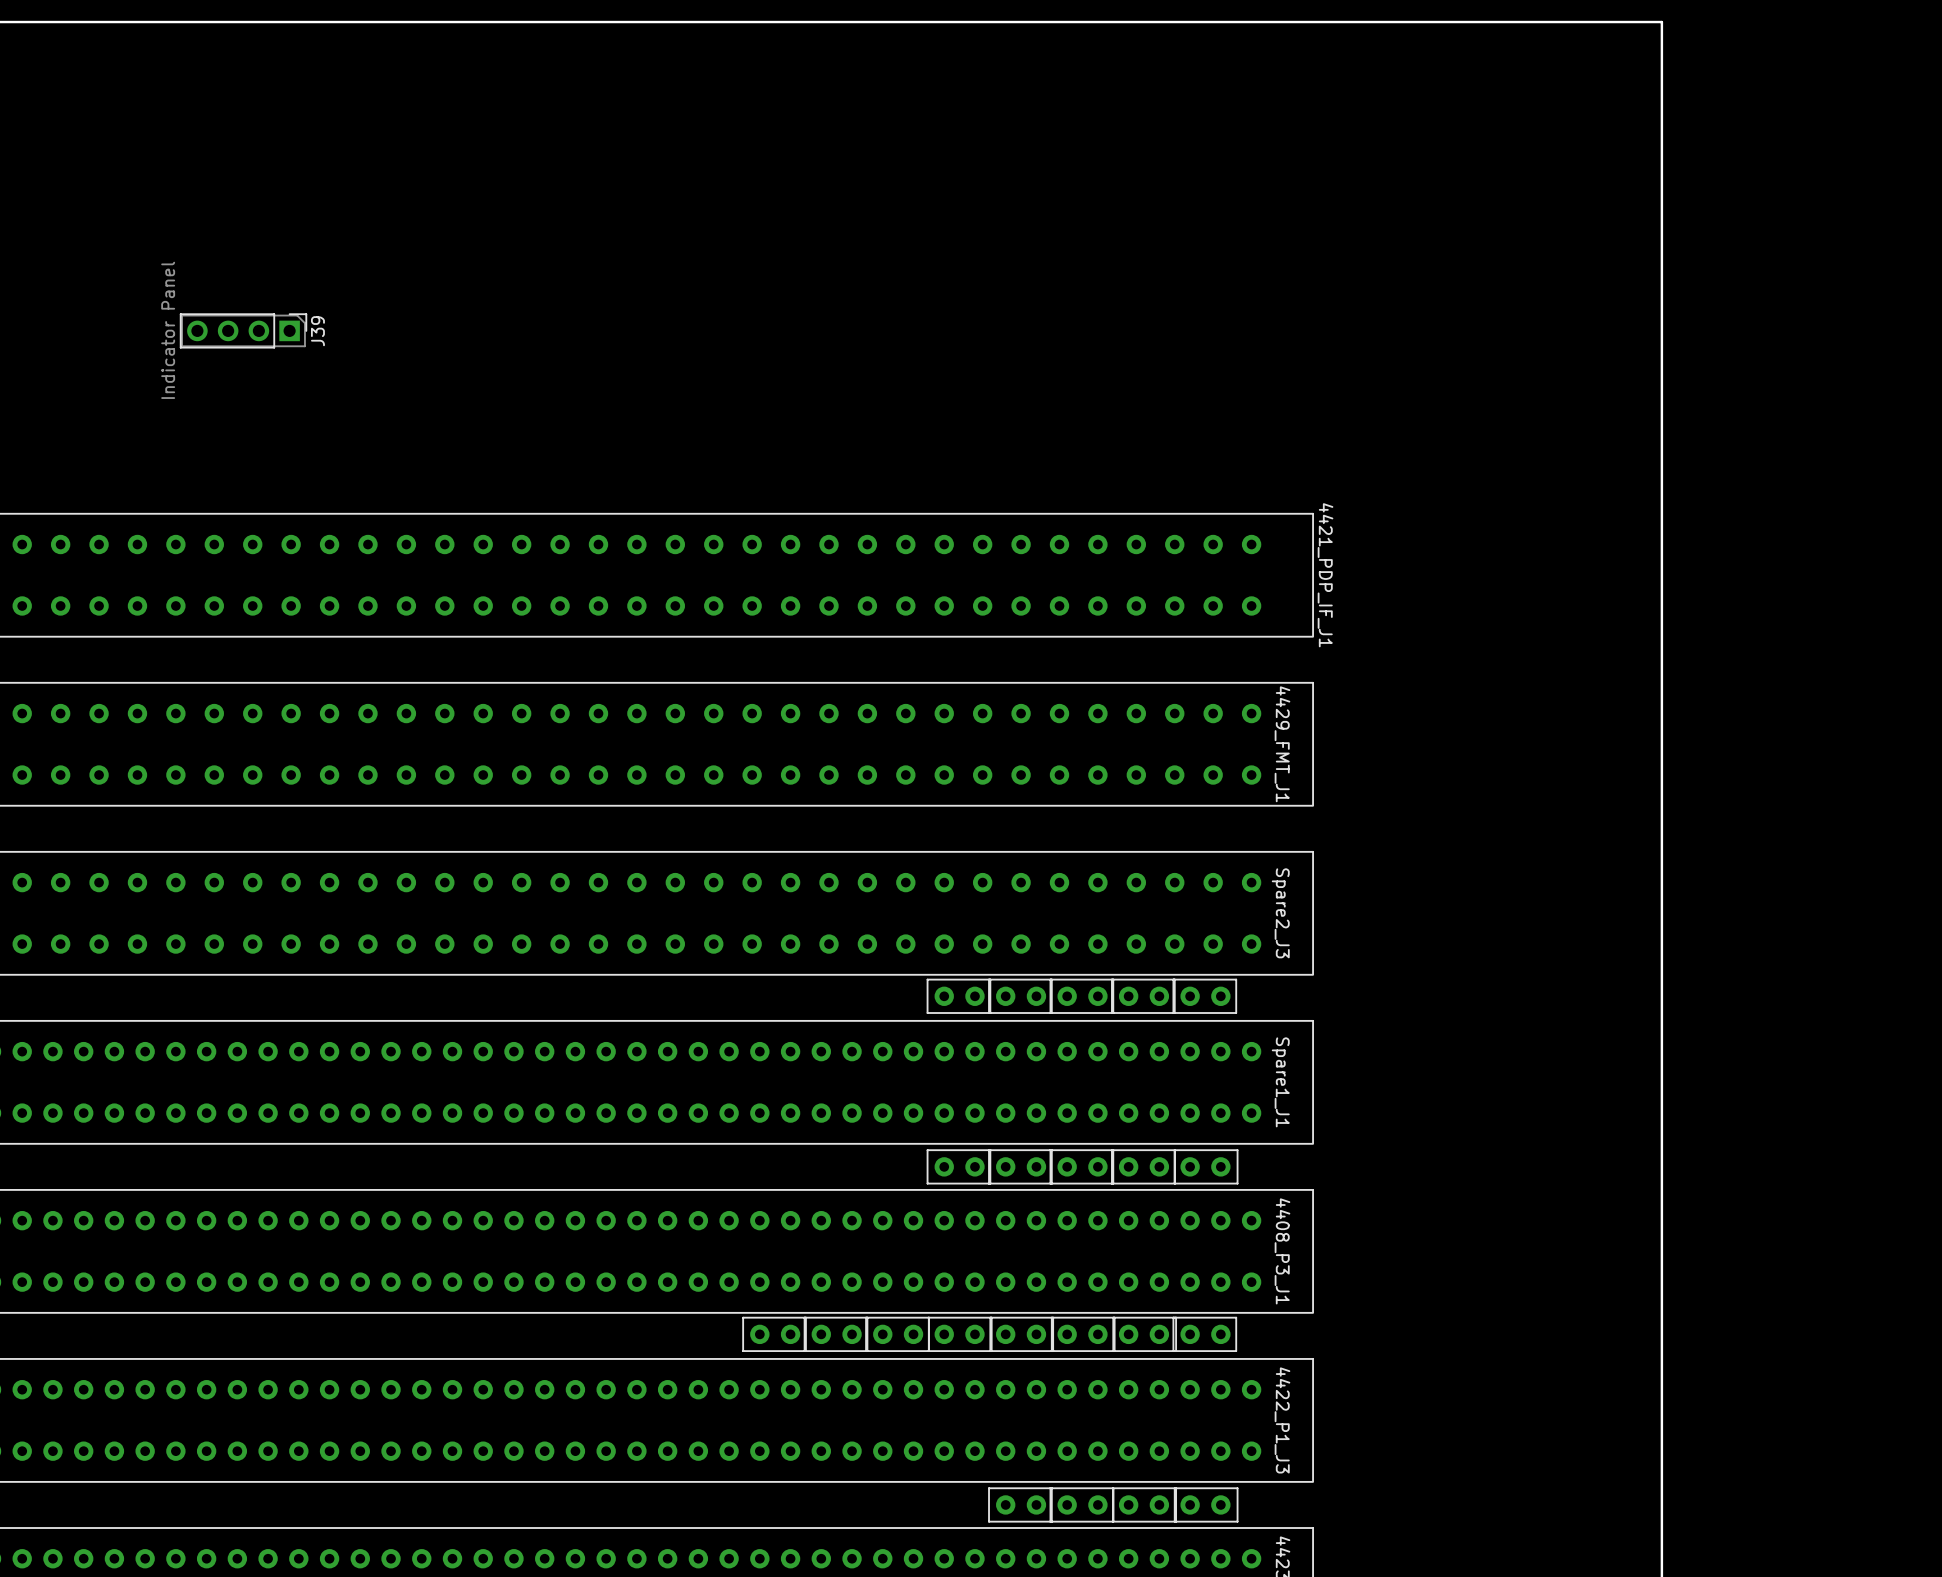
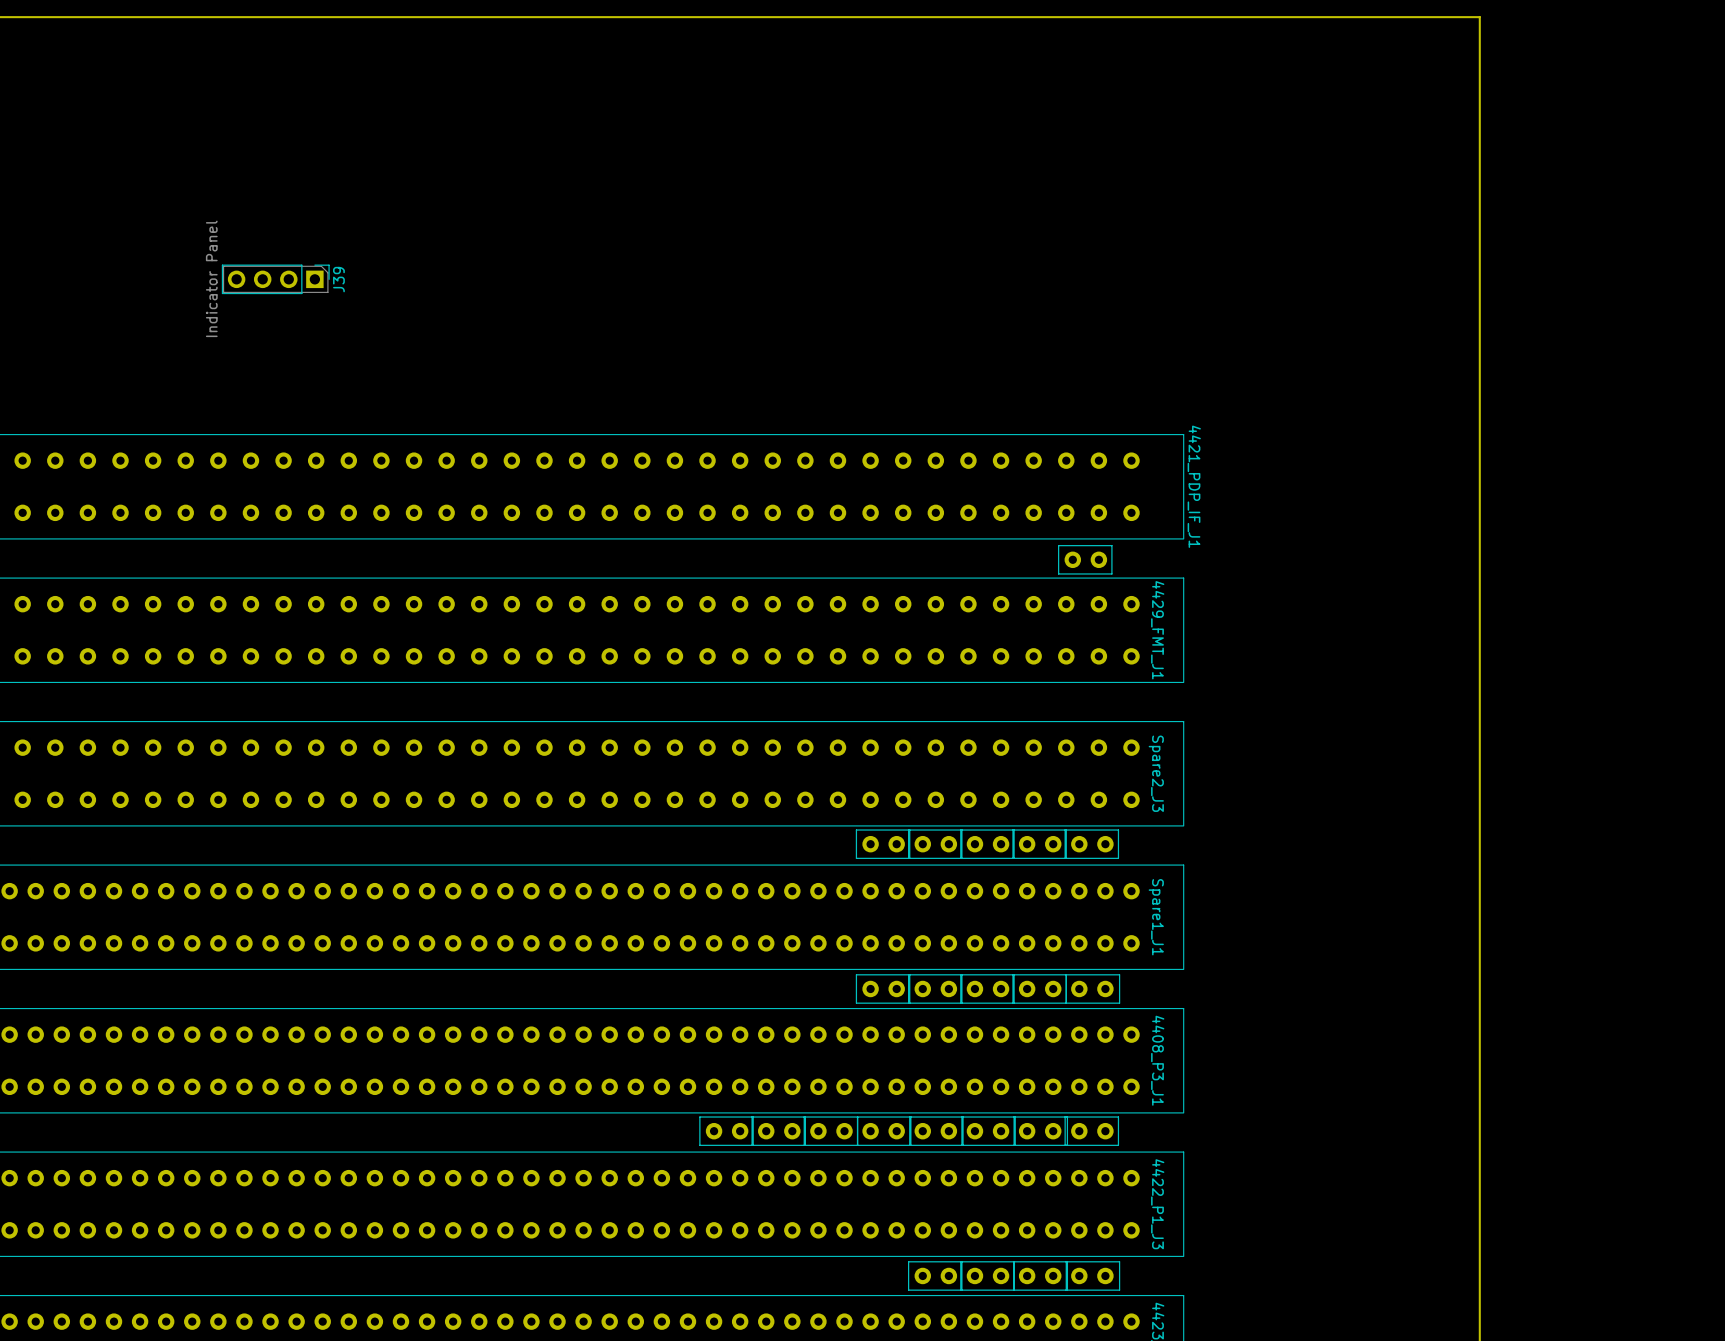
part: none -> (1085, 559)

